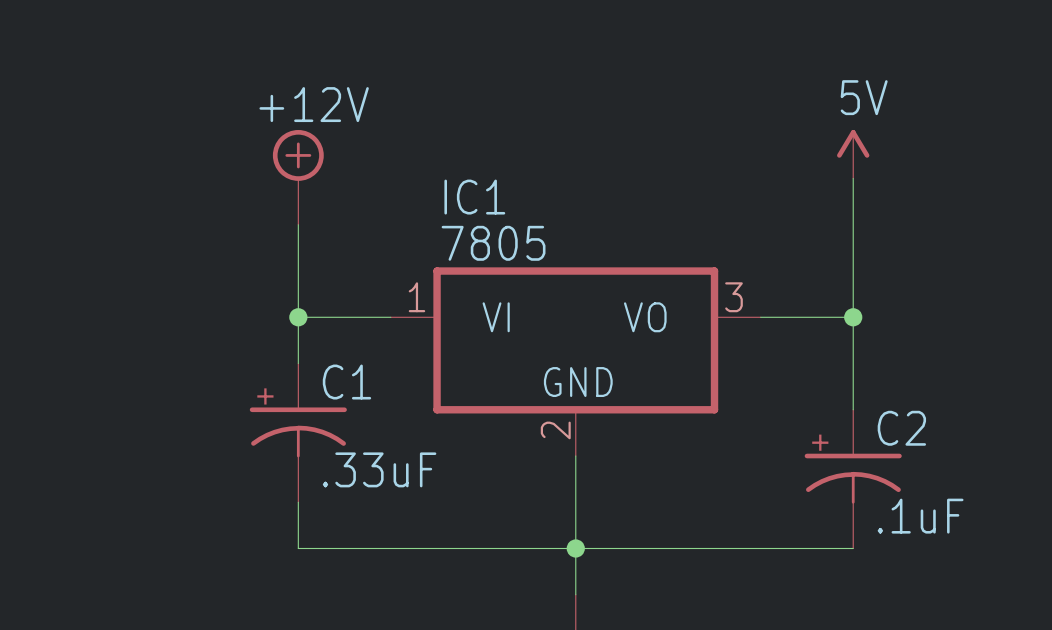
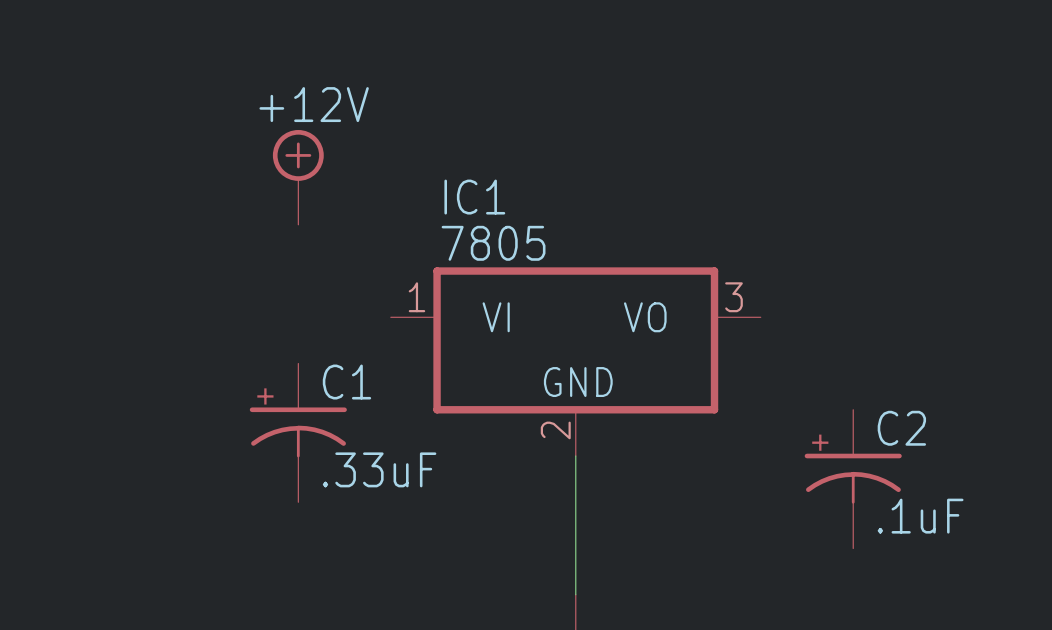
power symbol: 5V (853, 154) -> none
wire: (853, 178) (853, 409) -> none
wire: (298, 224) (298, 363) -> none
wire: (298, 317) (390, 317) -> none
junction: (298, 317) -> none
wire: (760, 317) (853, 317) -> none
junction: (853, 317) -> none
wire: (298, 502) (298, 548) (853, 548) -> none
junction: (575, 548) -> none

